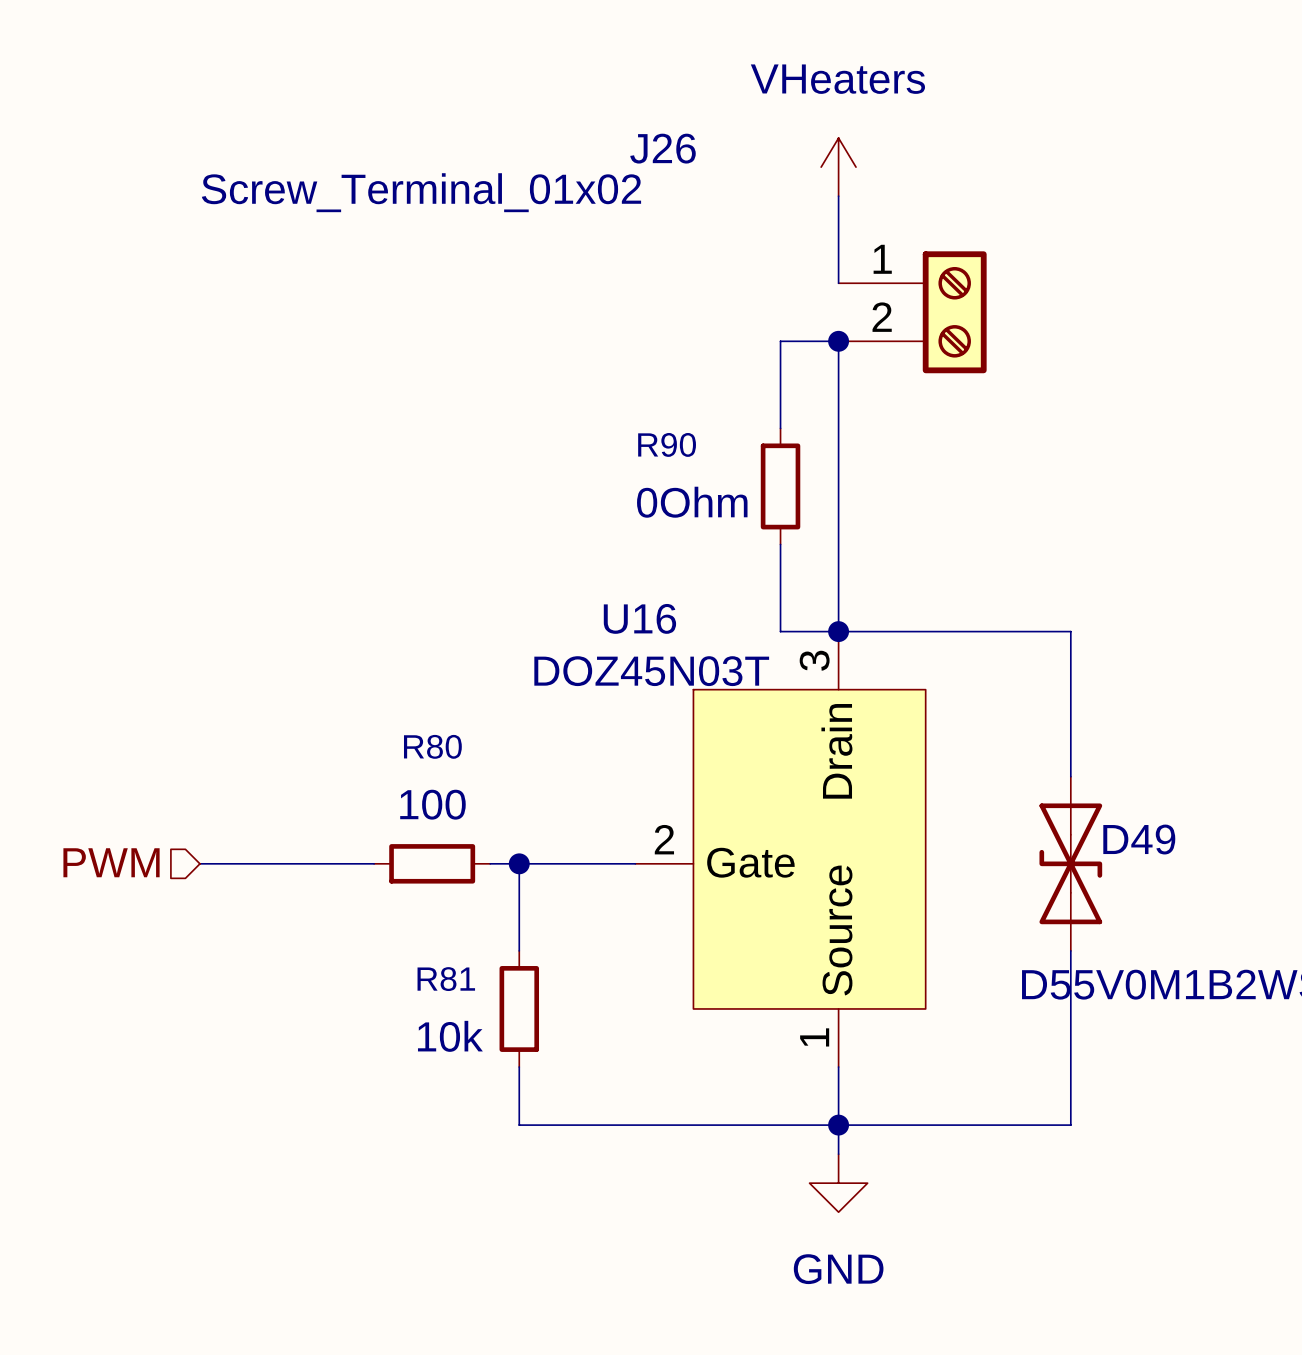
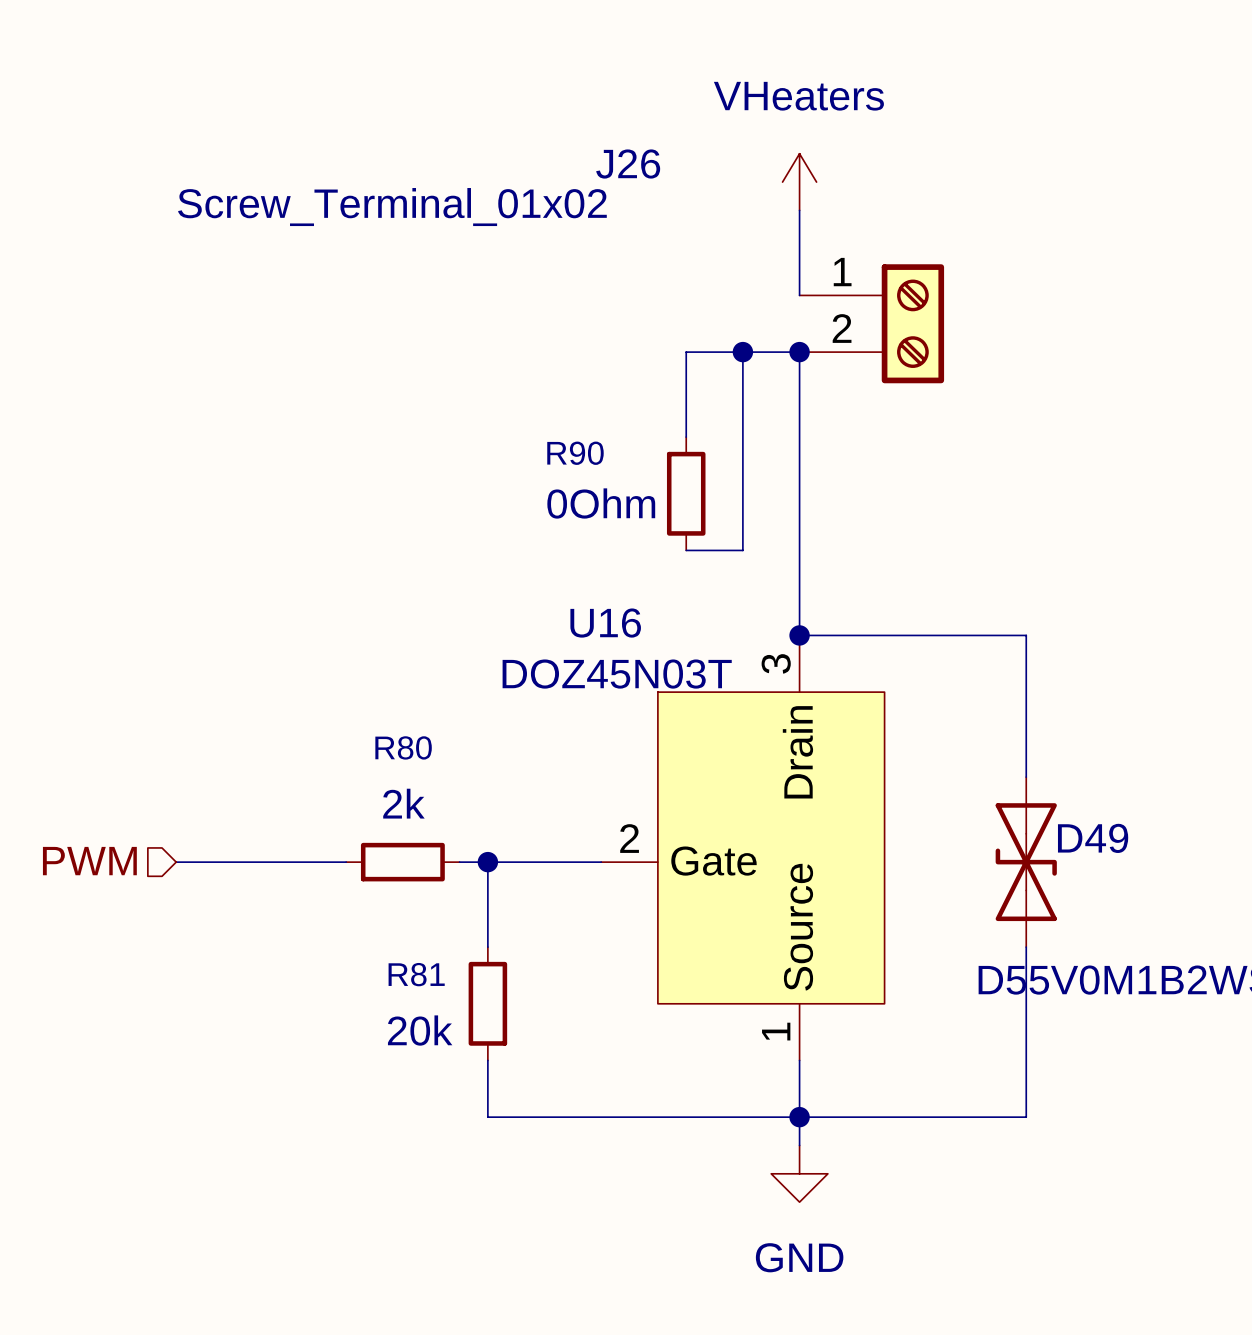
wire: none -> (742, 352) (686, 352) (686, 437)
junction: none -> (742, 352)
wire: none -> (742, 437) (742, 550) (686, 550)
R90 position: (780, 486) -> (686, 493)
R90 value position: 0Ohm (692, 502) -> 0Ohm (601, 503)
wire: (780, 544) (780, 631) (838, 631) -> none
R80 value: 100 (432, 804) -> 2k (403, 803)
R81 value: 10k (450, 1036) -> 20k (420, 1030)

